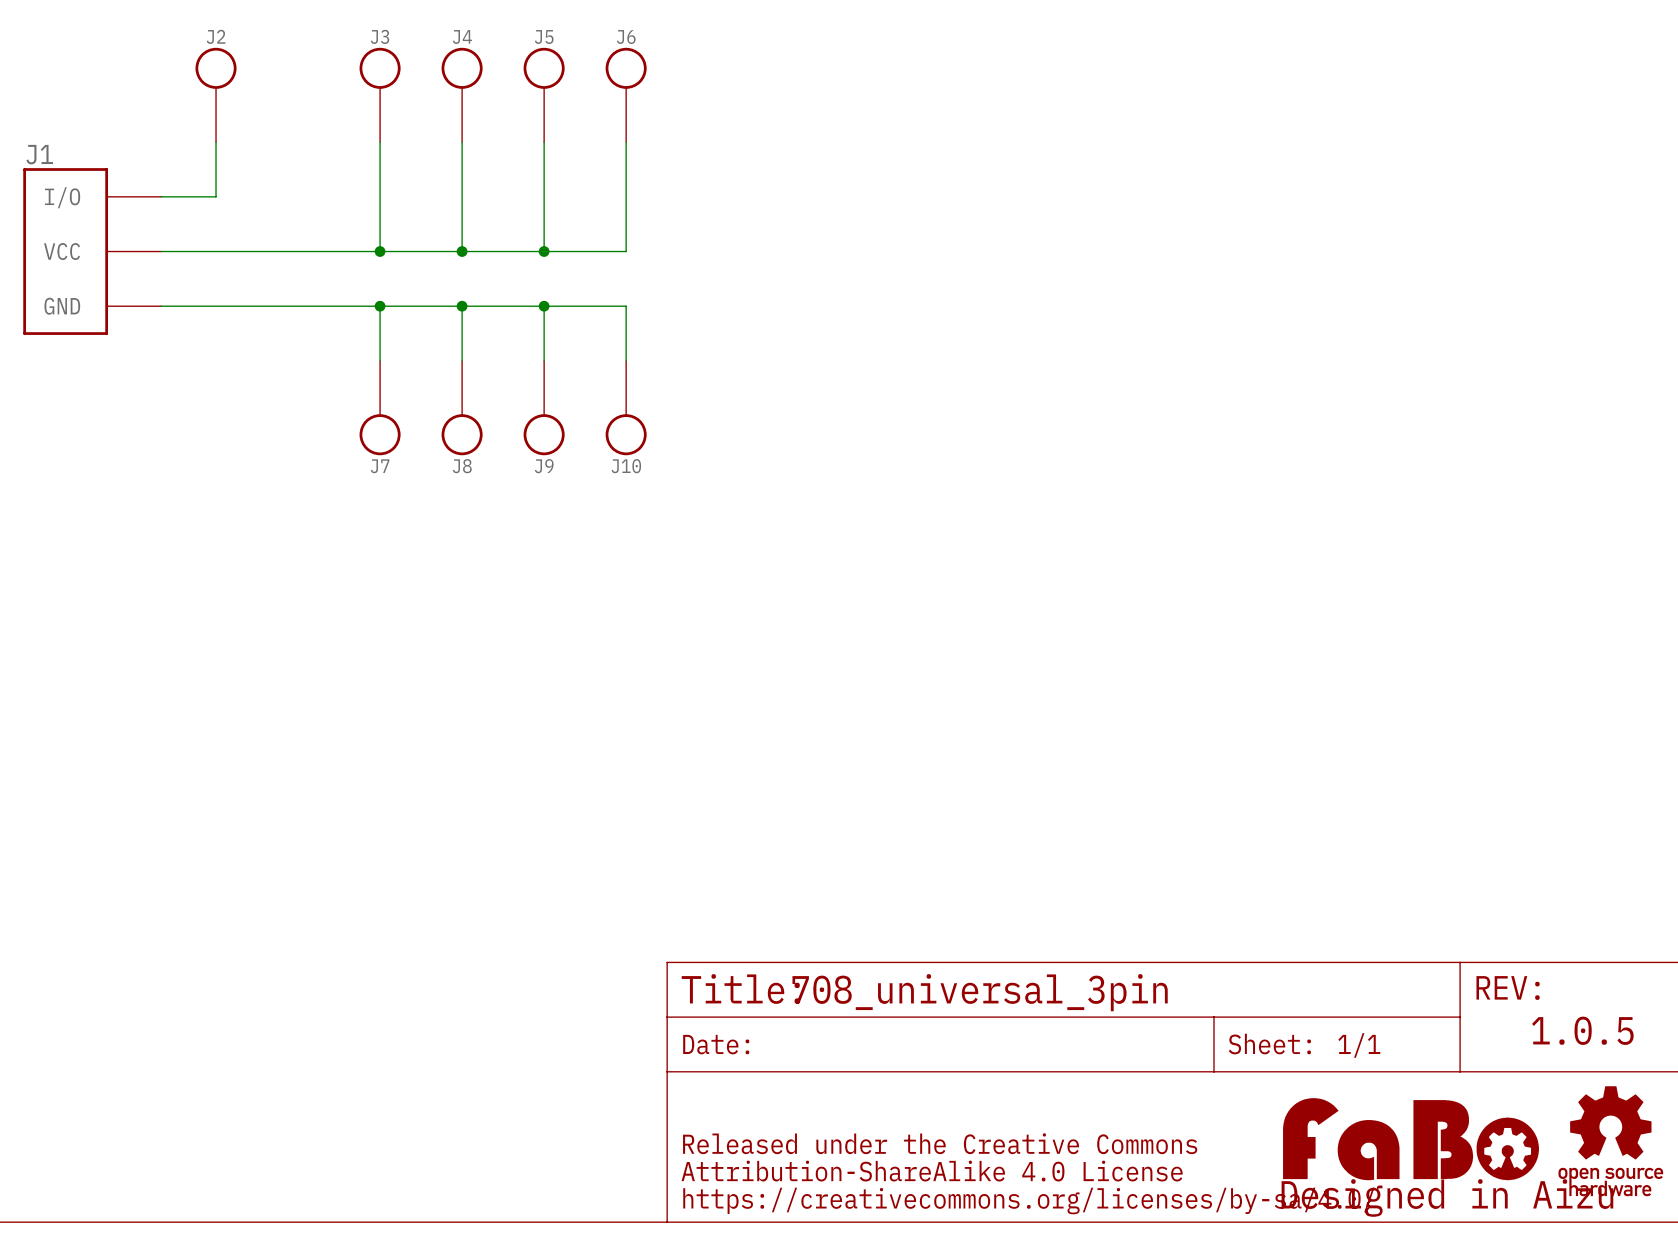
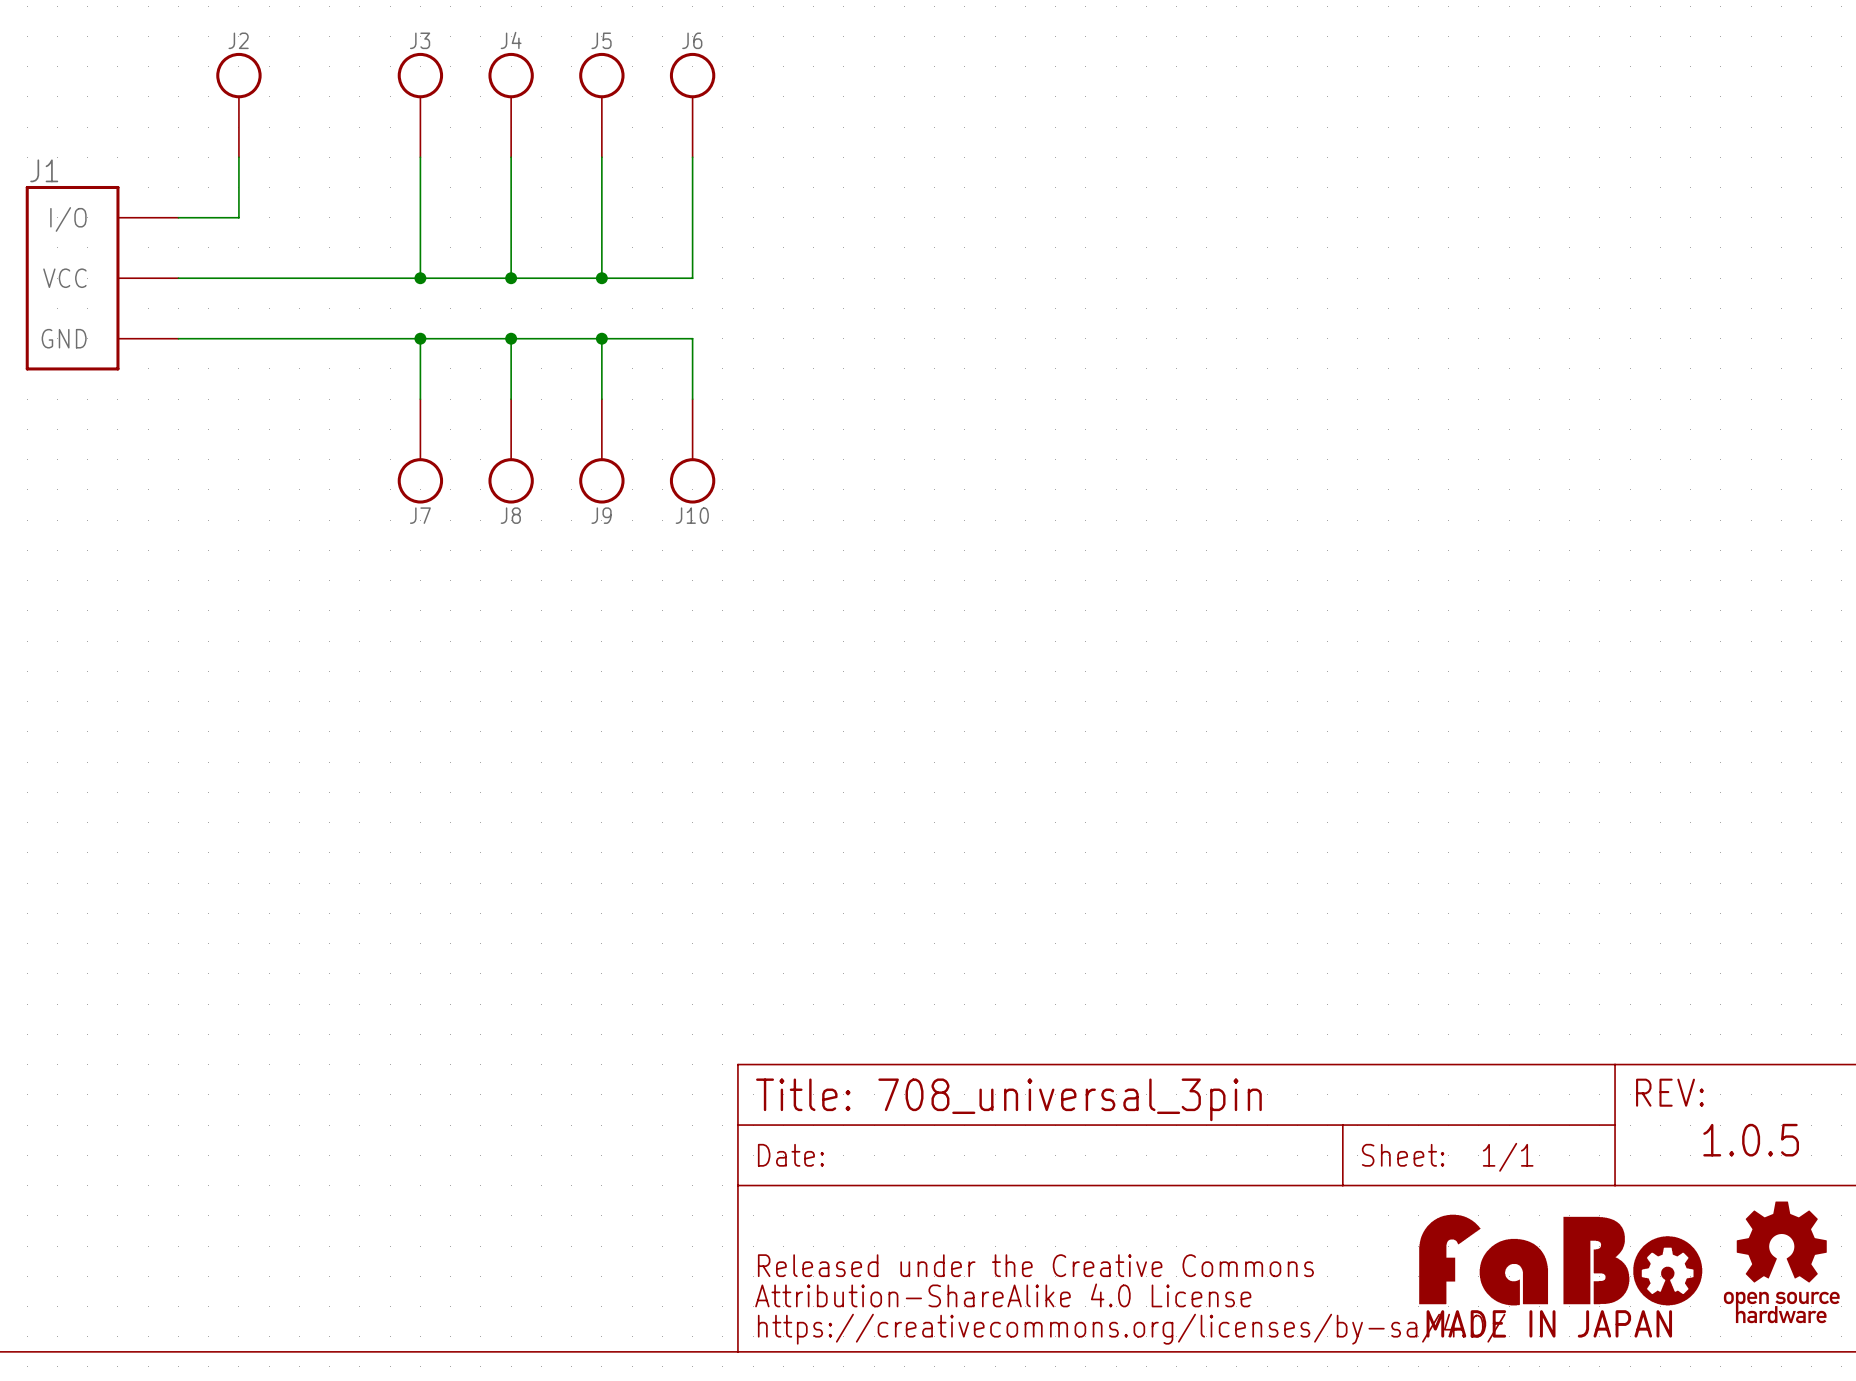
part text: none -> MADE IN JAPAN (1549, 1323)
part text: Designed in Aizu (1447, 1198) -> none

